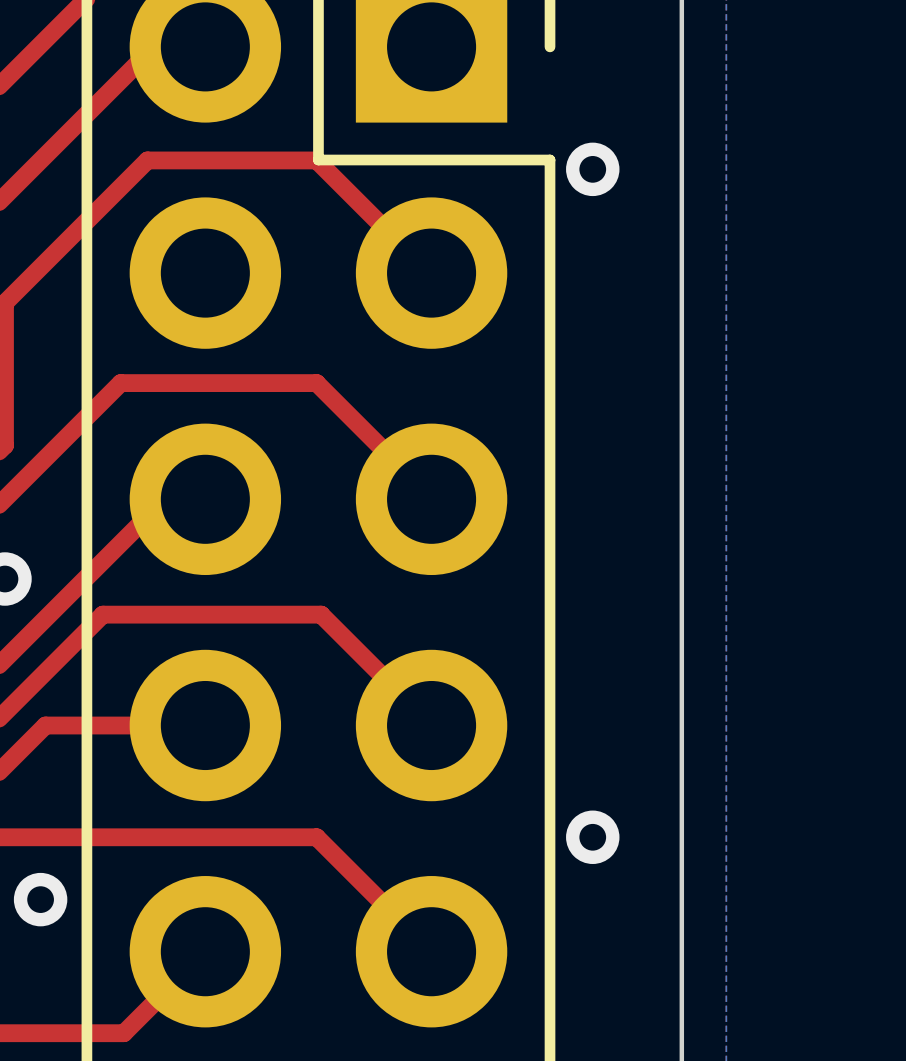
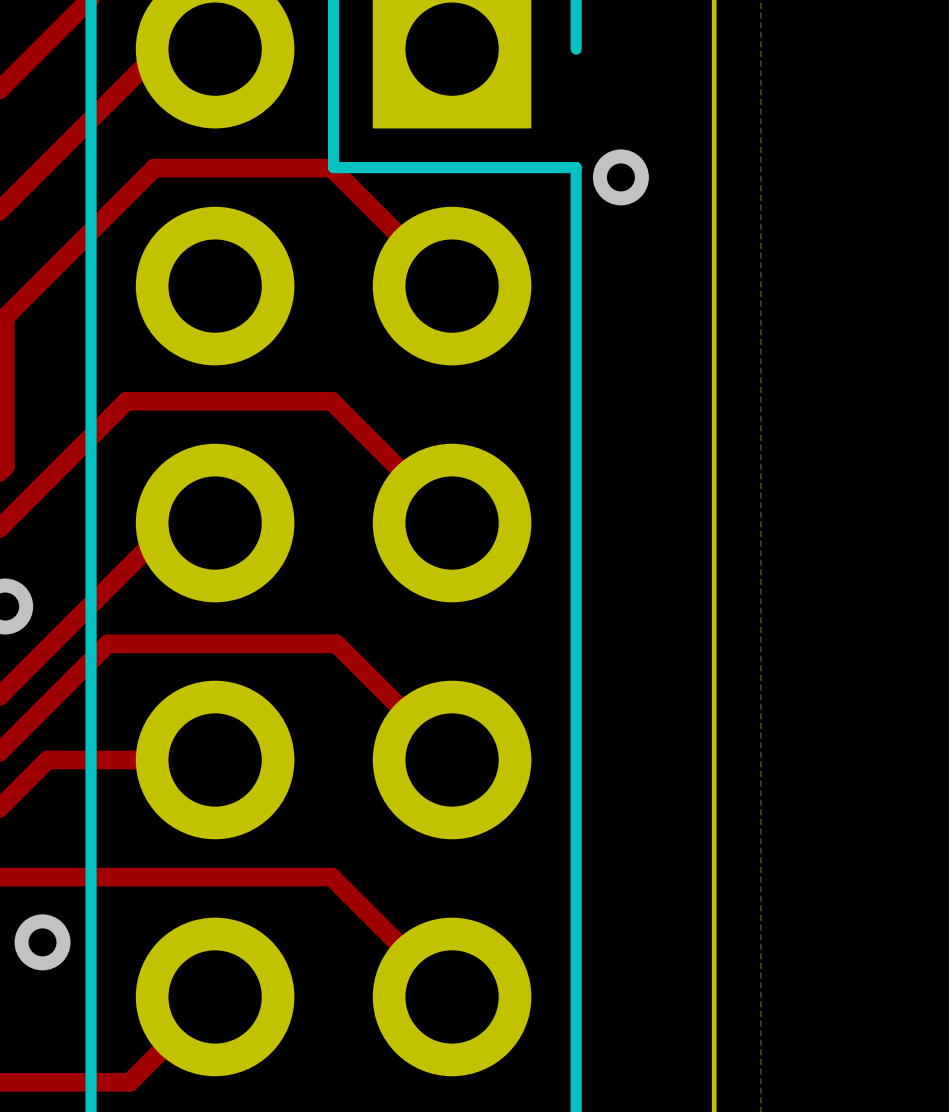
via: (592, 837) -> none

